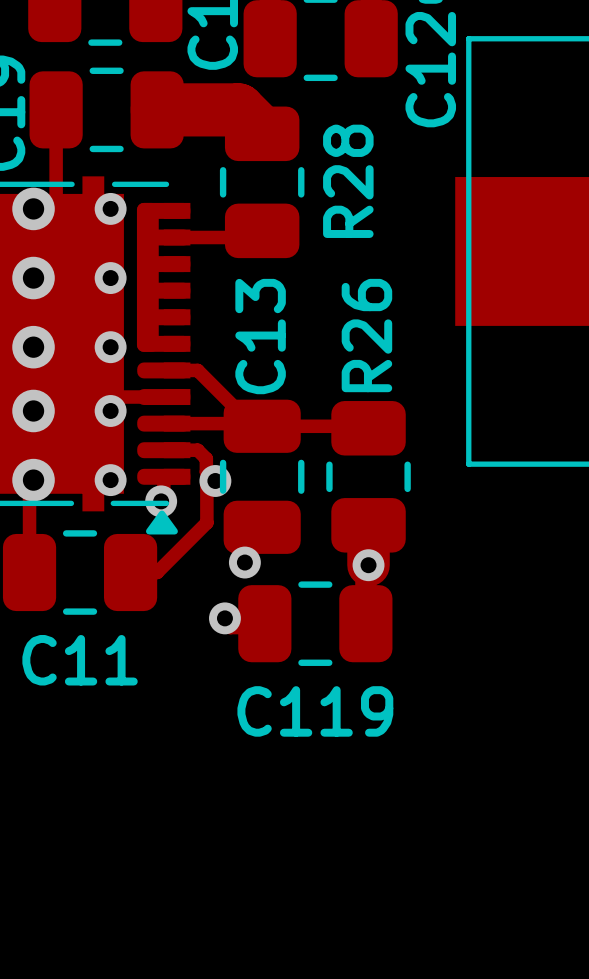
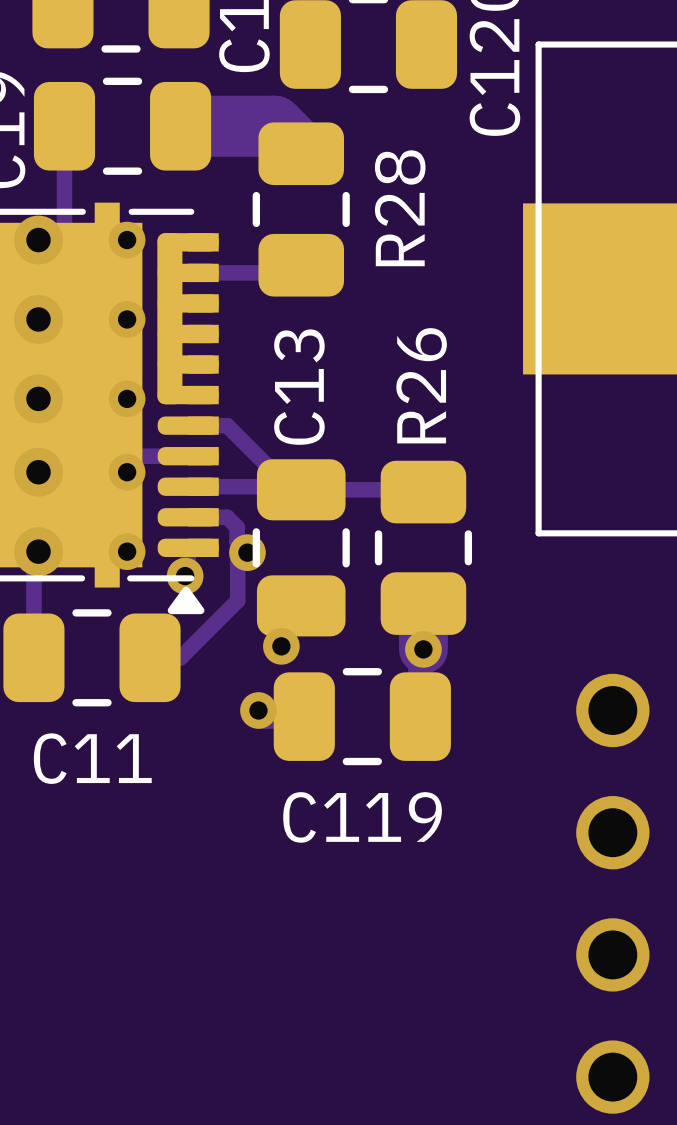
via: none -> (612, 710)
via: none -> (612, 832)
via: none -> (612, 954)
via: none -> (612, 1077)

